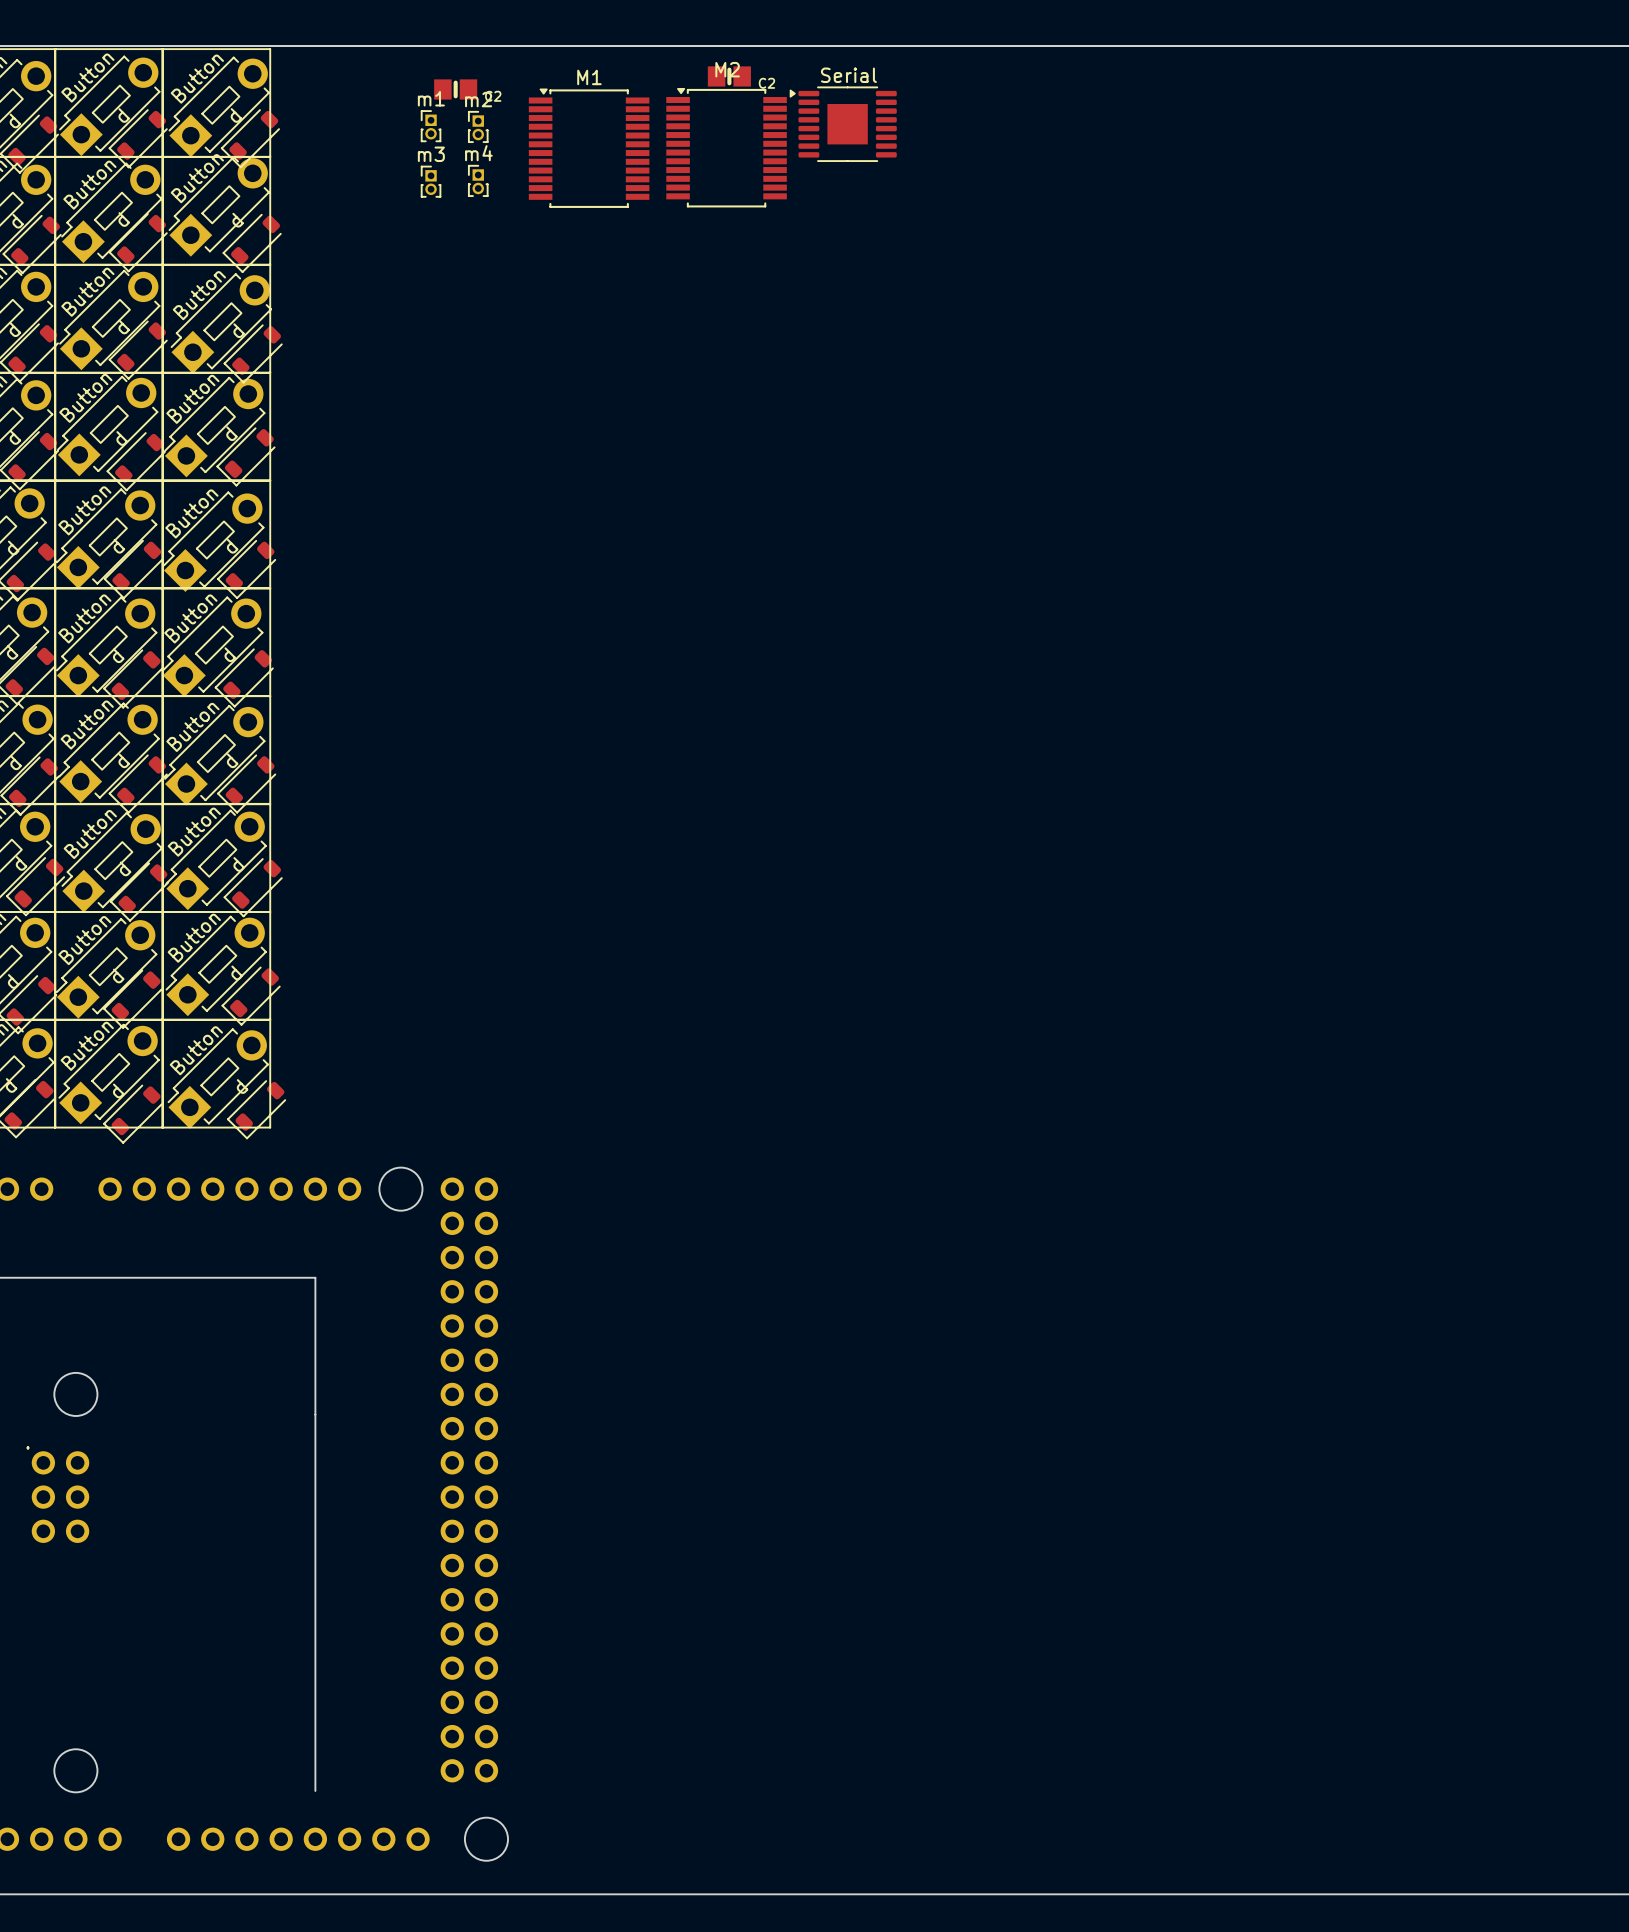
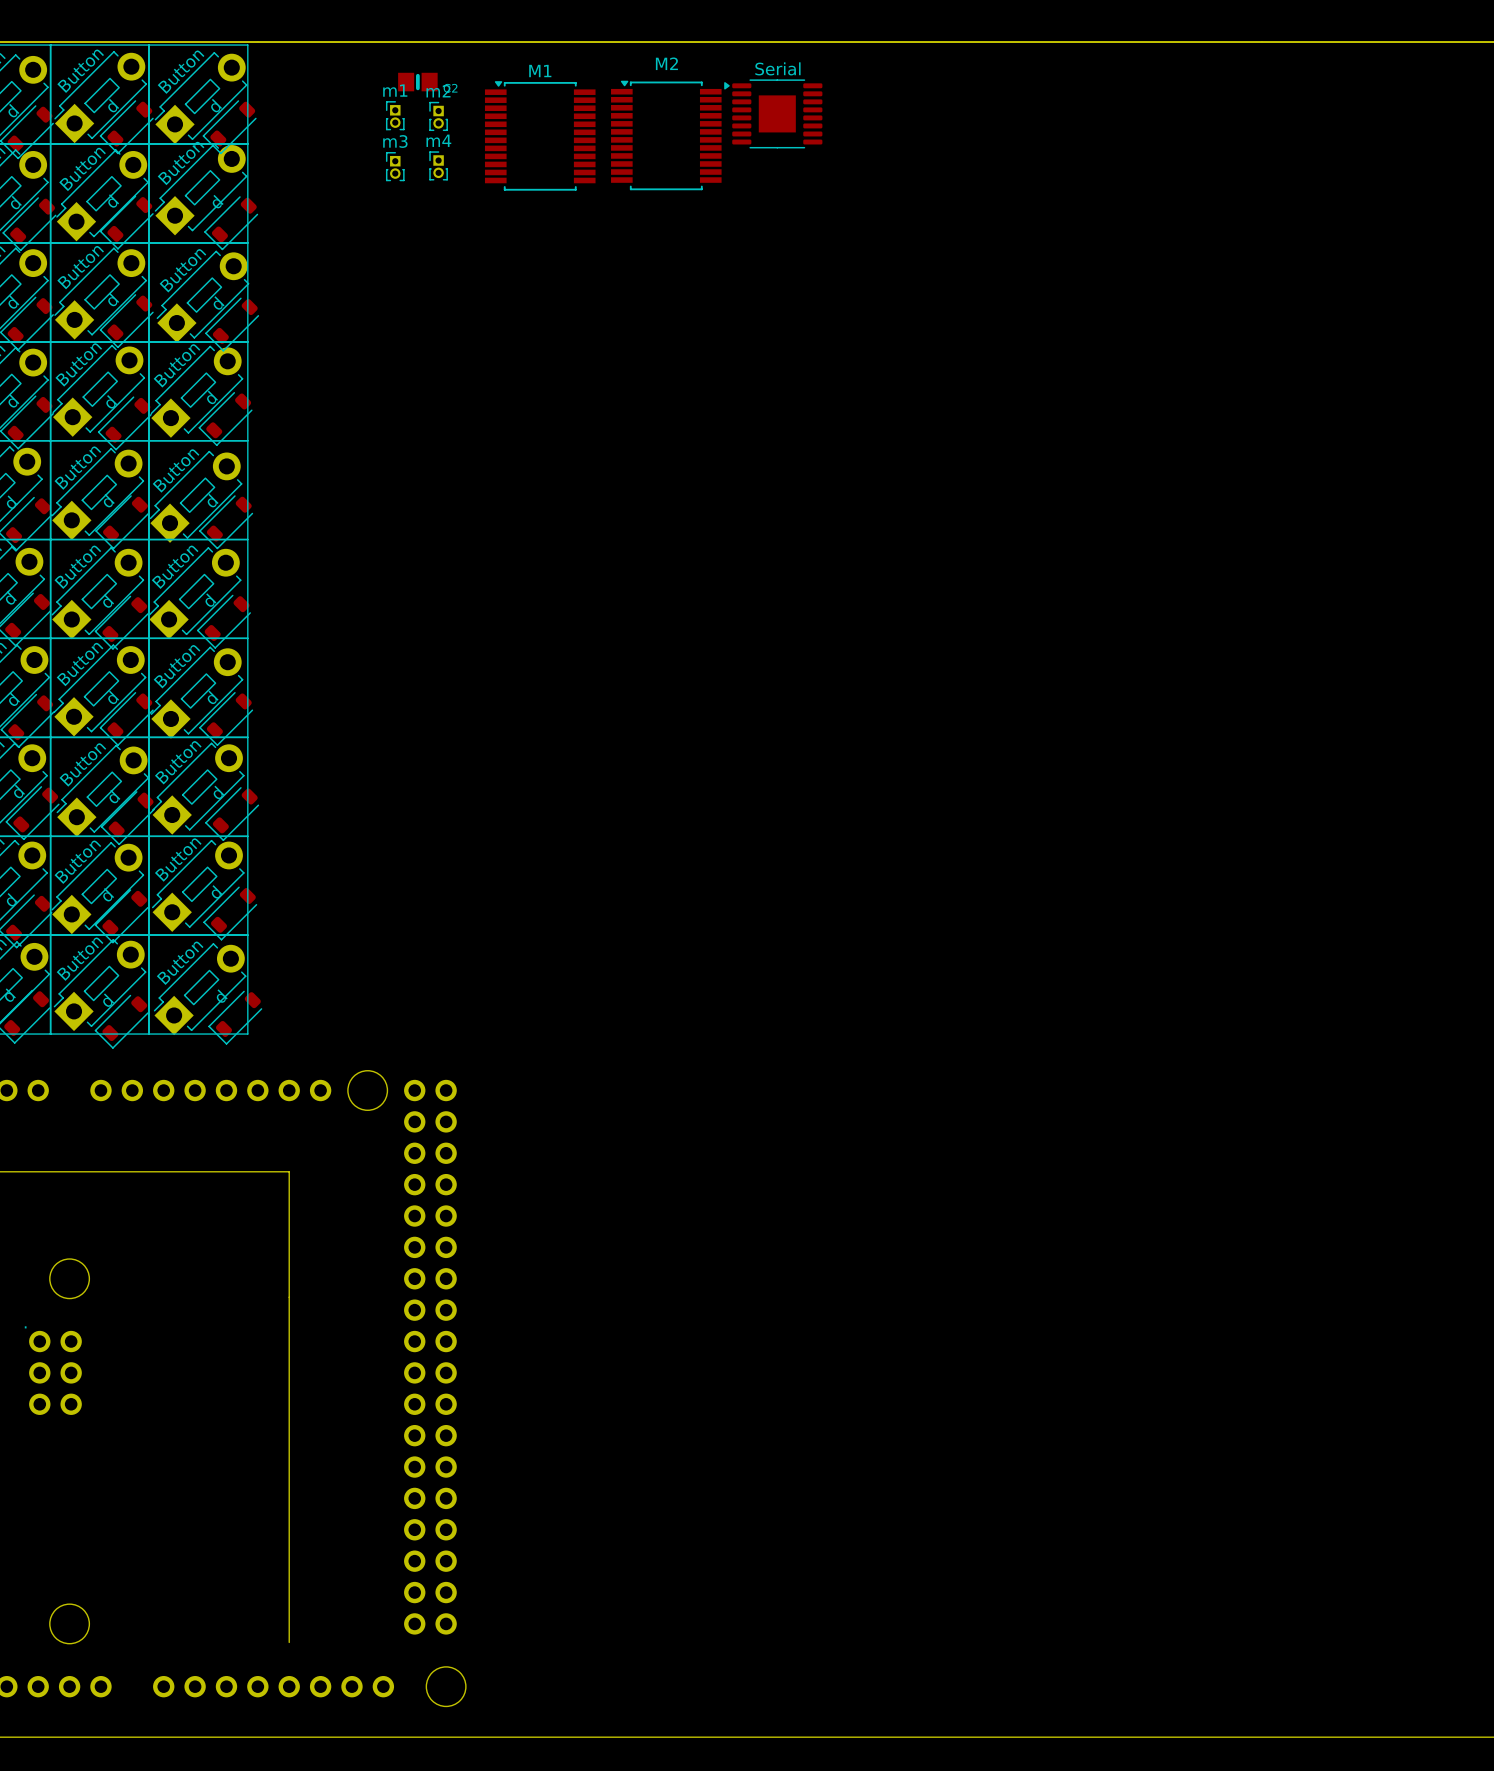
C2: (729, 76) -> none

